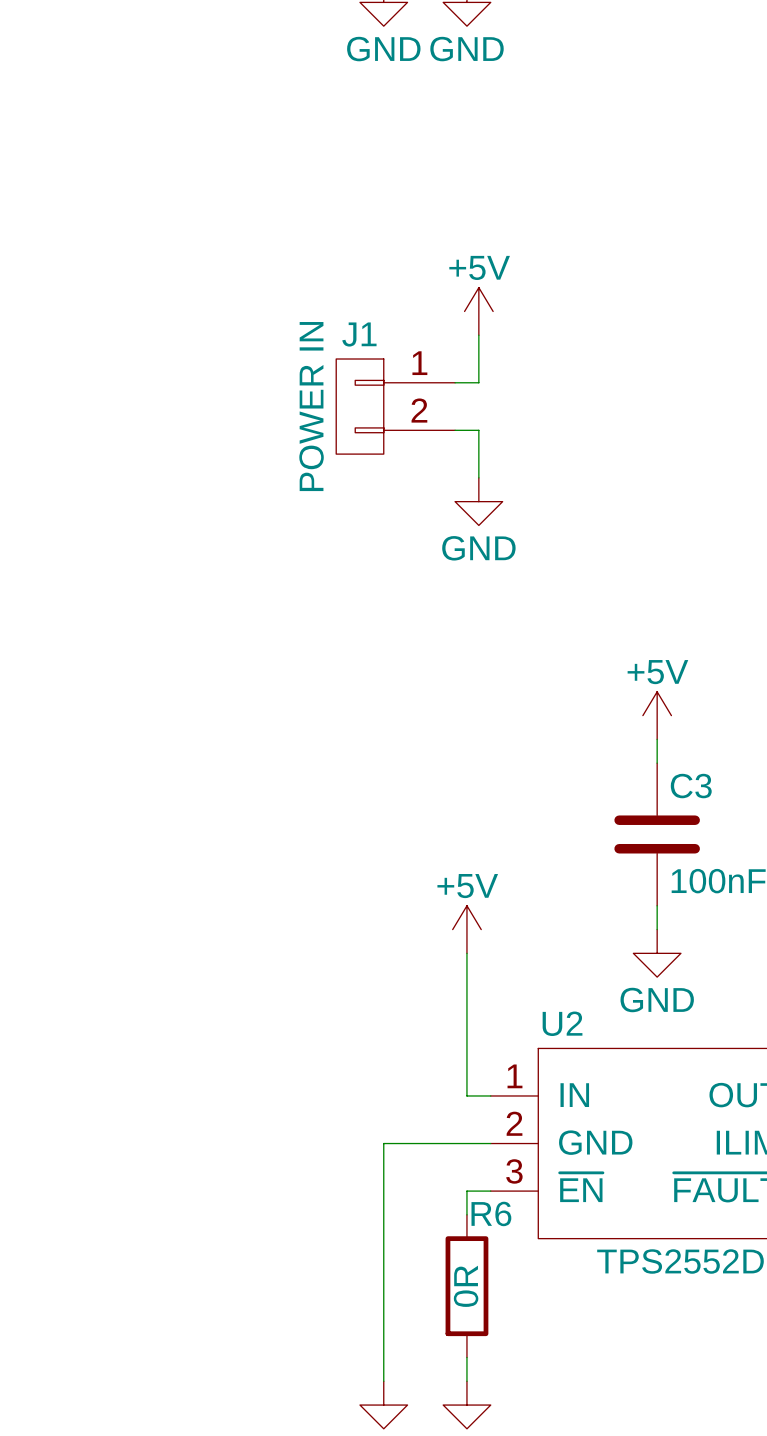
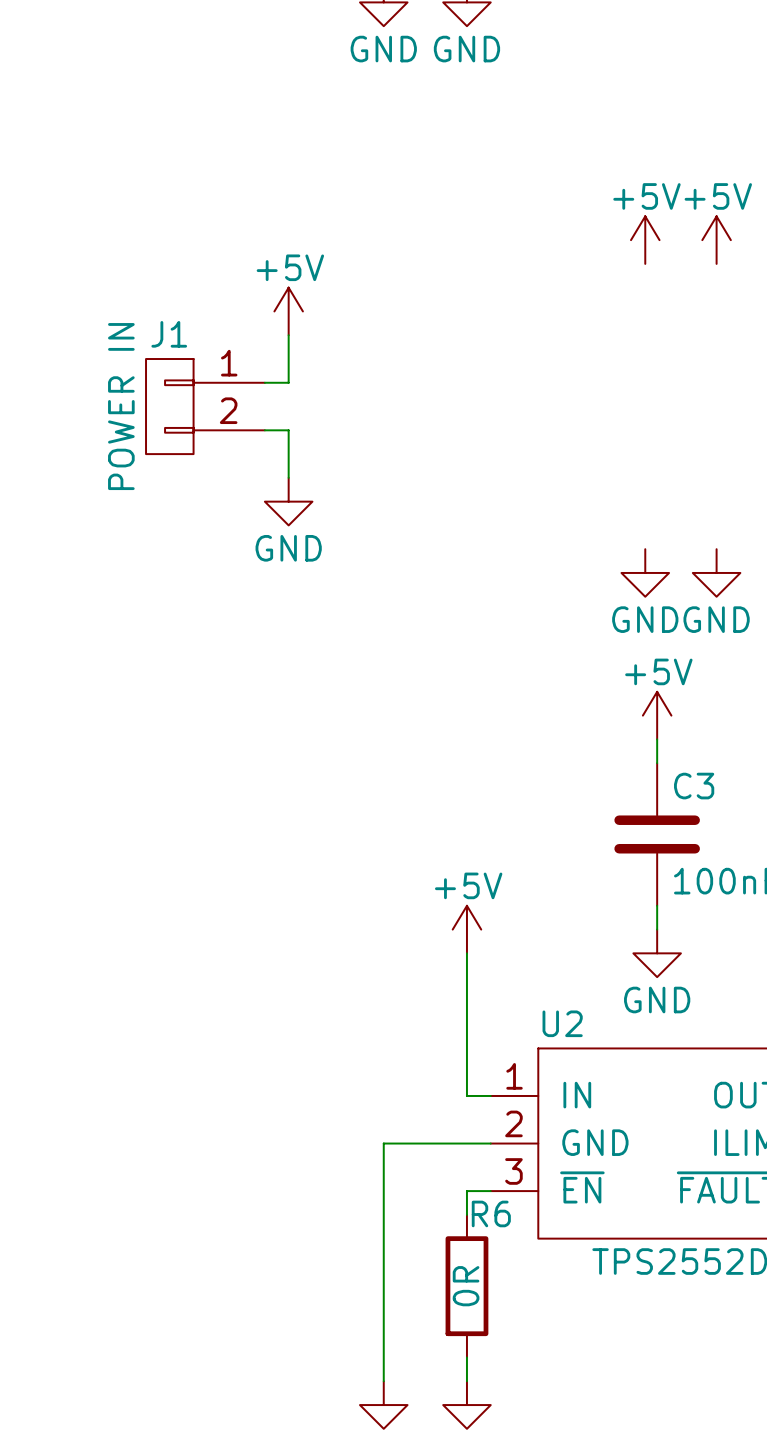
power symbol: none -> +5V (645, 240)
power symbol: none -> +5V (716, 240)
power symbol: none -> +5V (288, 311)
power symbol: +5V (478, 311) -> none
wire: (478, 335) (478, 382) (455, 382) -> (288, 335) (288, 382) (264, 382)
J1 position: (395, 406) -> (205, 406)
wire: (455, 430) (478, 430) (478, 477) -> (264, 430) (288, 430) (288, 477)
power symbol: none -> GND (288, 501)
power symbol: GND (478, 501) -> none
power symbol: none -> GND (645, 572)
power symbol: none -> GND (716, 572)

